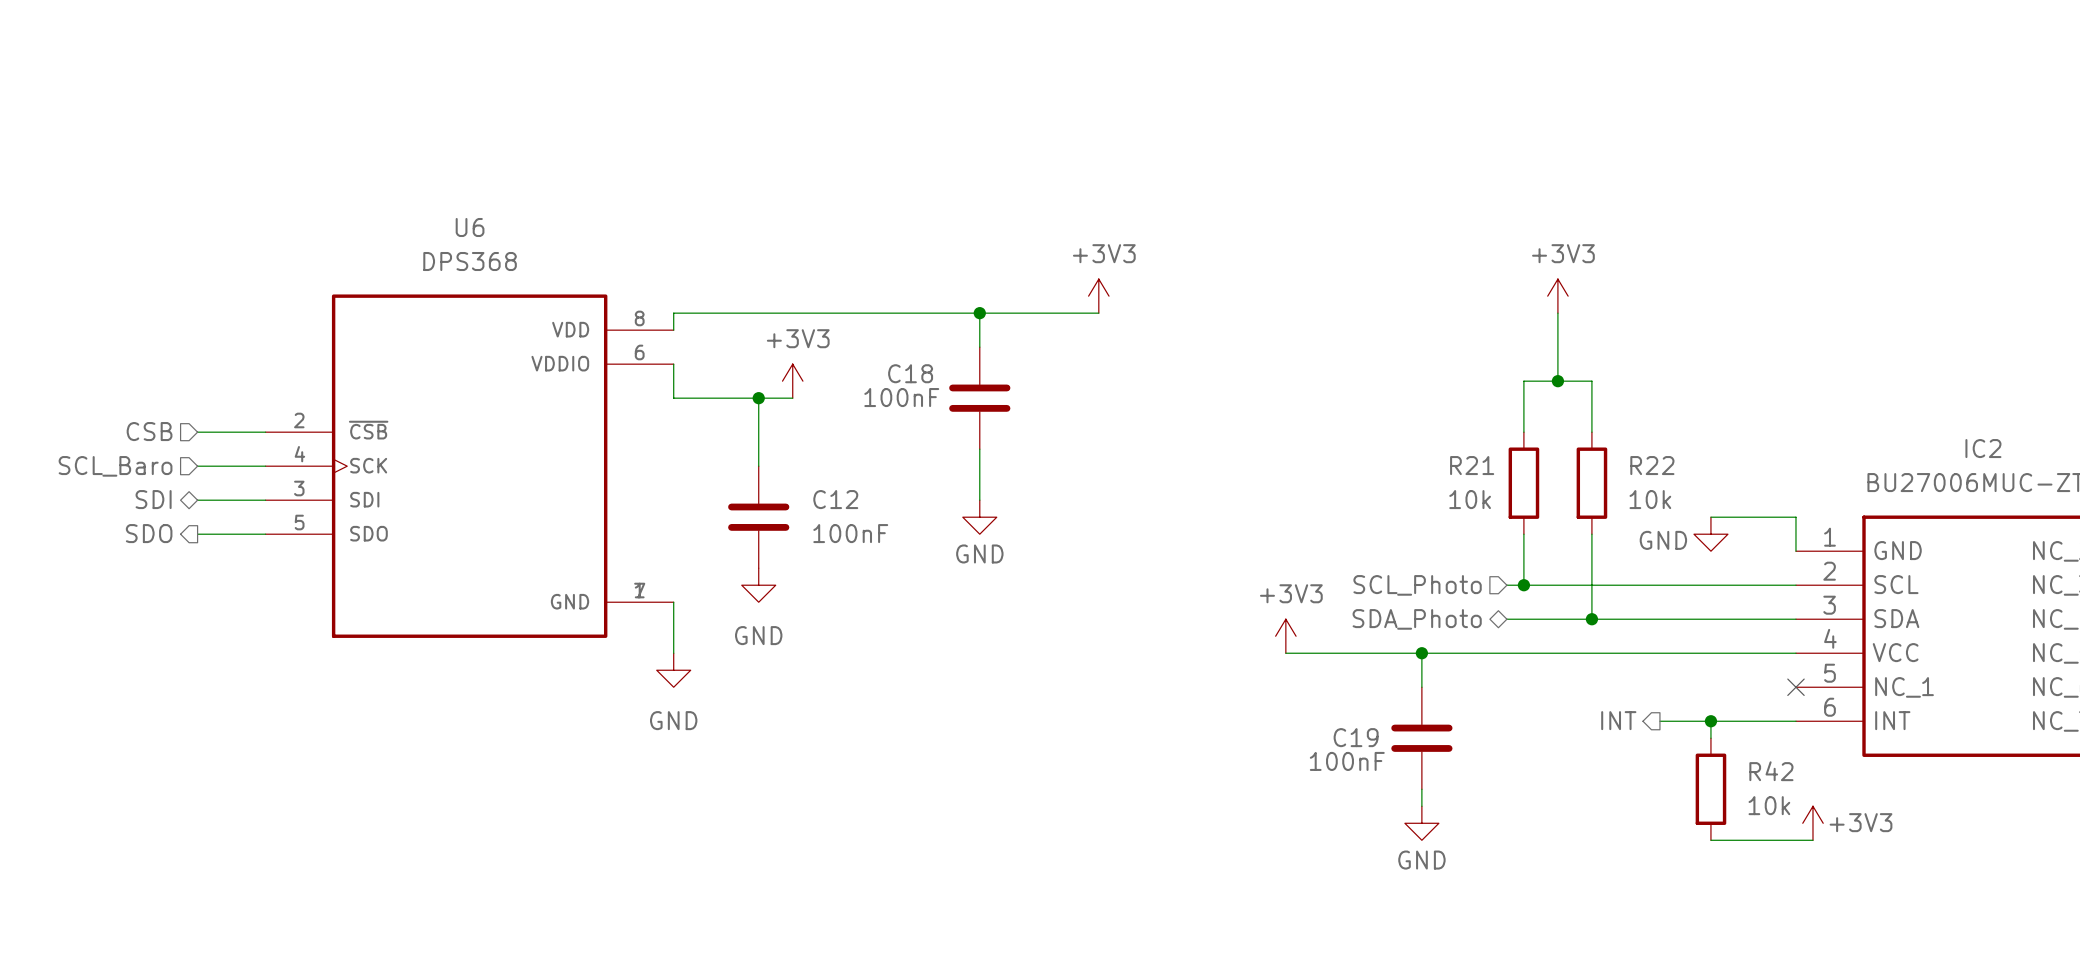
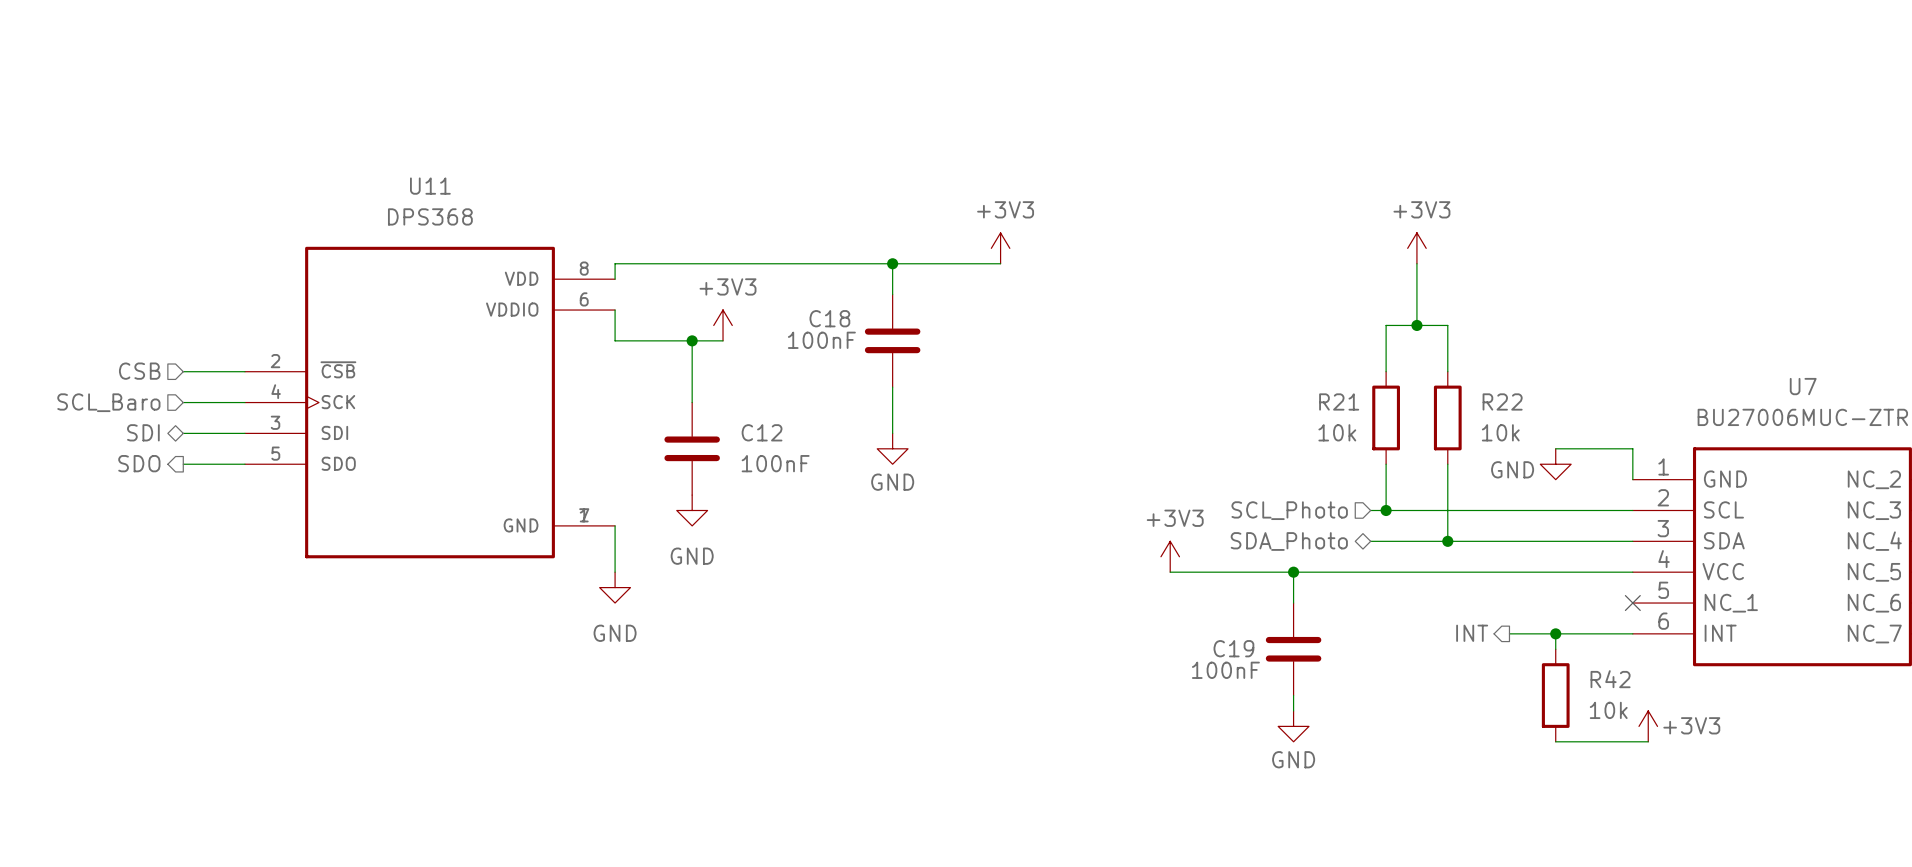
U6 name: U6 (470, 227) -> U11 (430, 186)
IC2 name: IC2 (1983, 448) -> U7 (1803, 386)

